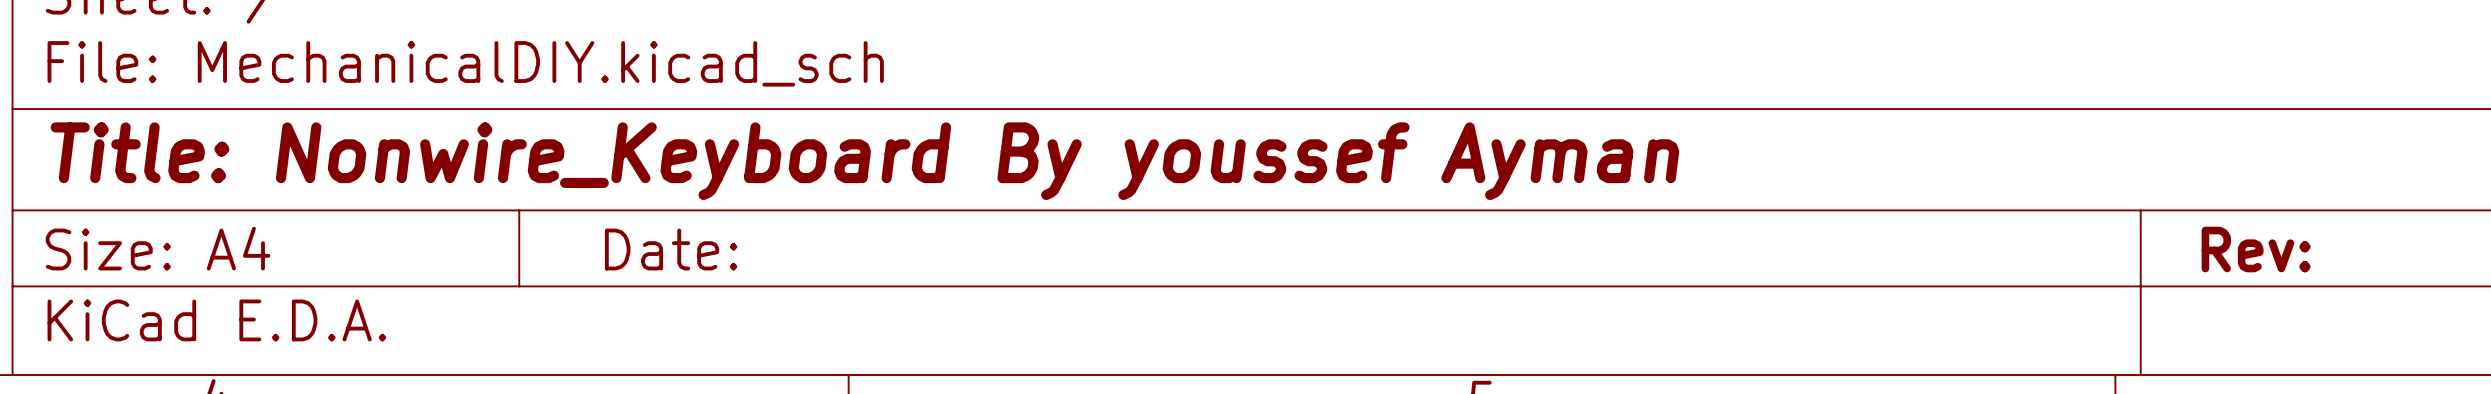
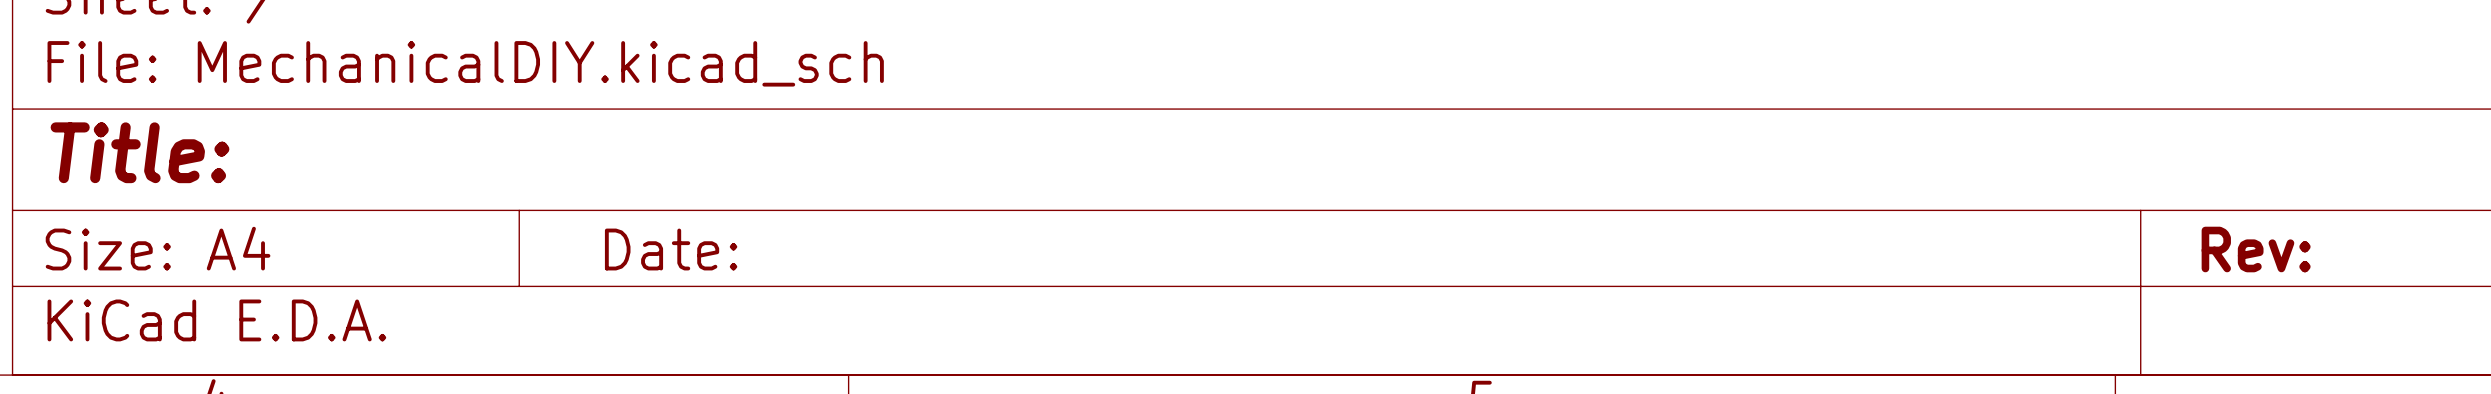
title block: Title: Nonwire_Keyboard By youssef Ayman (864, 161) -> Title: (140, 152)

